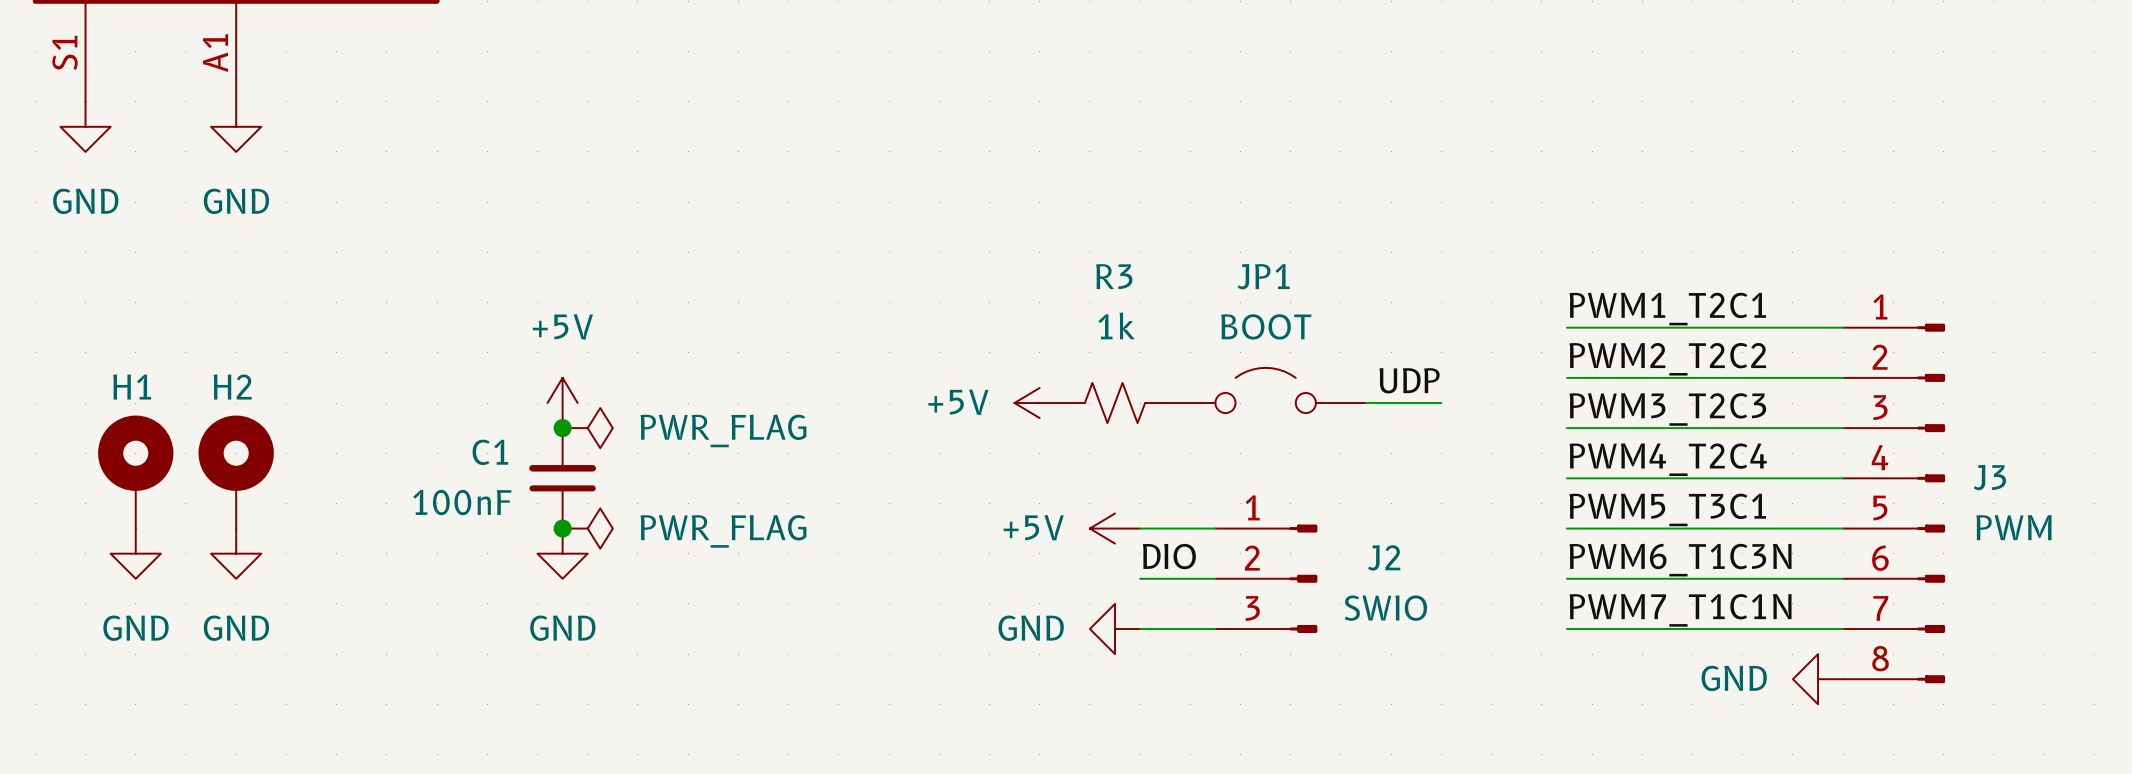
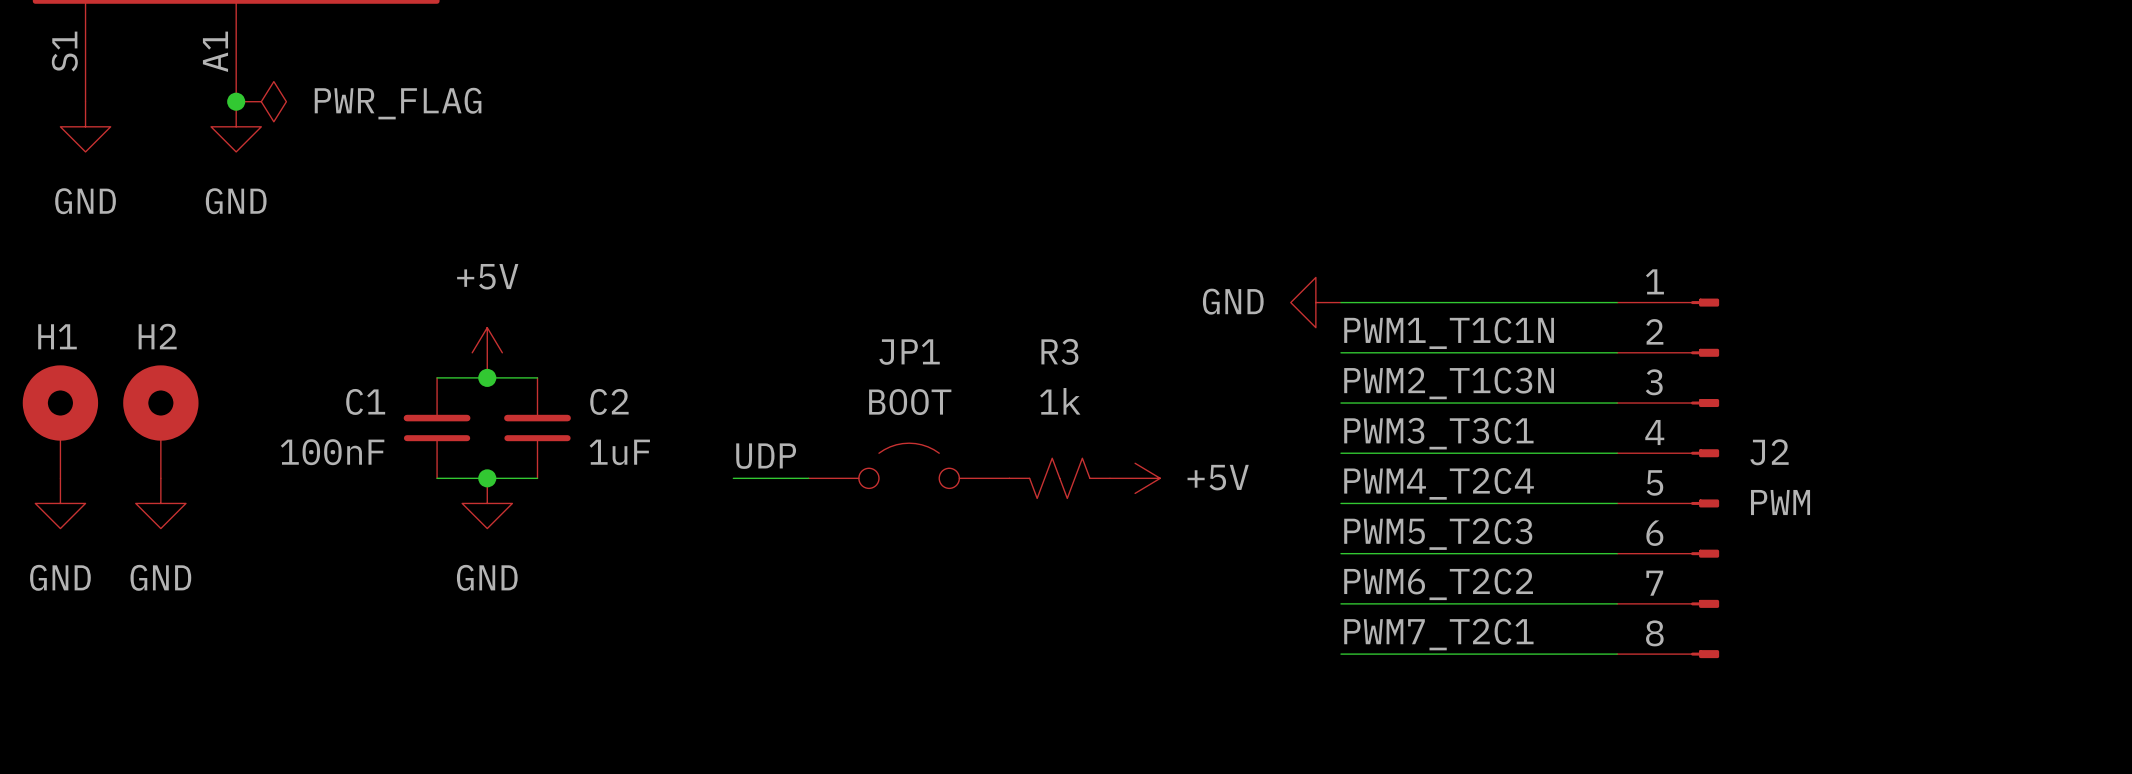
junction: none -> (236, 101)
power symbol: none -> PWR_FLAG (261, 101)
power symbol: none -> GND (1315, 302)
label: PWM1_T2C1 (1667, 309) -> none
wire: (1566, 327) (1843, 327) -> (1340, 302) (1617, 302)
label: none -> PWM1_T1C1N (1449, 333)
label: PWM2_T2C2 (1667, 359) -> none
wire: none -> (437, 377) (537, 377)
junction: none -> (487, 377)
wire: (1566, 377) (1843, 377) -> (1340, 352) (1617, 352)
label: UDP (1409, 380) -> none
label: none -> PWM2_T1C3N (1449, 383)
JP1 position: (1265, 390) -> (909, 465)
power symbol position: +5V (562, 403) -> +5V (487, 352)
power symbol: +5V (1039, 403) -> none
R3 flip: as is (1115, 403) -> left-right (1059, 478)
R3 position: (1115, 403) -> (1059, 478)
wire: none -> (1441, 403) (1617, 403)
label: PWM3_T2C3 (1667, 409) -> none
C2: none -> 1uF (537, 428)
junction: (562, 428) -> none
power symbol: PWR_FLAG (587, 428) -> none
wire: (1566, 428) (1843, 428) -> (1340, 453) (1617, 453)
label: none -> PWM3_T3C1 (1438, 433)
label: none -> UDP (766, 456)
label position: PWM4_T2C4 (1668, 459) -> PWM4_T2C4 (1439, 483)
H1 position: (135, 472) -> (60, 421)
H2 position: (236, 472) -> (160, 421)
wire: none -> (437, 478) (537, 478)
junction: none -> (487, 478)
C1 position: (562, 478) -> (437, 428)
wire: (1566, 478) (1843, 478) -> (1340, 603) (1617, 603)
power symbol: none -> GND (60, 503)
power symbol: none -> GND (160, 503)
J3: PWM (1894, 503) -> none
label: PWM5_T3C1 (1667, 509) -> none
J2 symbol: [1215, 524, 1318, 634] -> [1617, 298, 1720, 659]
junction: (562, 528) -> none
power symbol: PWR_FLAG (587, 528) -> none
power symbol rotation: 0° (1115, 528) -> 180° (1135, 478)
power symbol position: +5V (1115, 528) -> +5V (1135, 478)
wire: (1140, 528) (1215, 528) -> (733, 478) (808, 478)
wire: (1566, 528) (1843, 528) -> (1340, 503) (1617, 503)
label: none -> PWM5_T2C3 (1438, 534)
power symbol: GND (135, 553) -> none
power symbol: GND (236, 553) -> none
power symbol position: GND (562, 553) -> GND (487, 503)
label: DIO (1169, 556) -> none
label: PWM6_T1C3N (1680, 560) -> none
wire: (1140, 578) (1215, 578) -> none
wire: (1566, 578) (1843, 578) -> (1340, 553) (1617, 553)
label: none -> PWM6_T2C2 (1438, 584)
J2 value: SWIO (1385, 608) -> PWM (1780, 502)
label: PWM7_T1C1N (1680, 610) -> none
power symbol: GND (1115, 628) -> none
wire: (1140, 628) (1215, 628) -> none
wire: (1566, 628) (1843, 628) -> (1340, 654) (1617, 654)
label: none -> PWM7_T2C1 (1438, 634)
power symbol: GND (1818, 679) -> none

